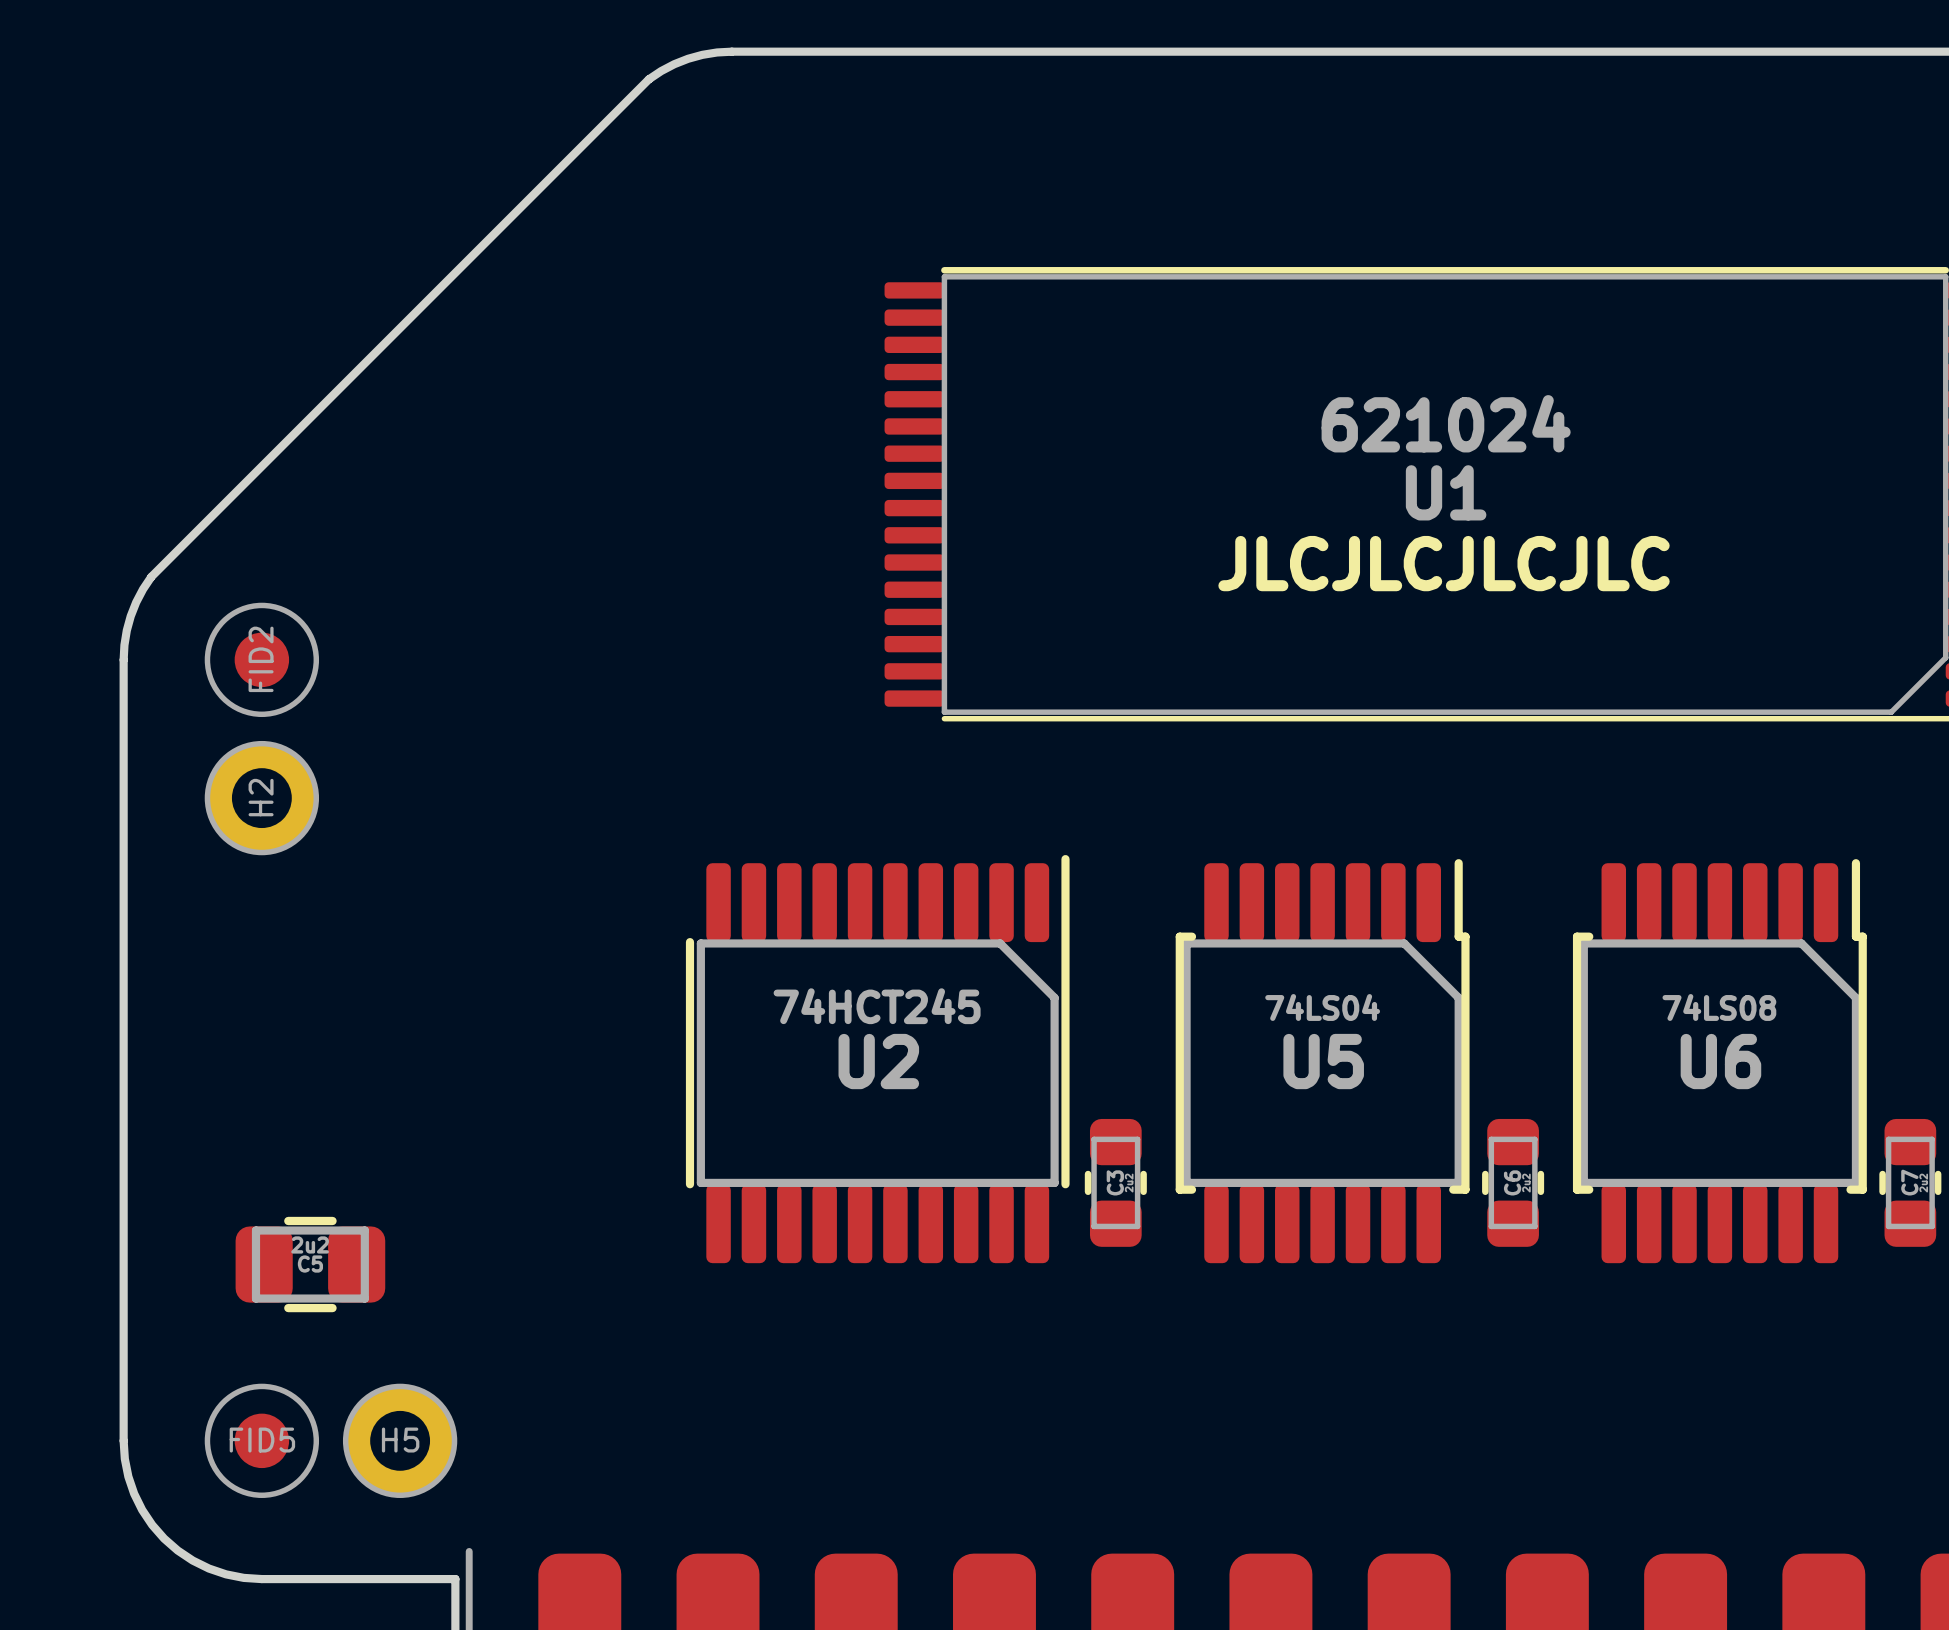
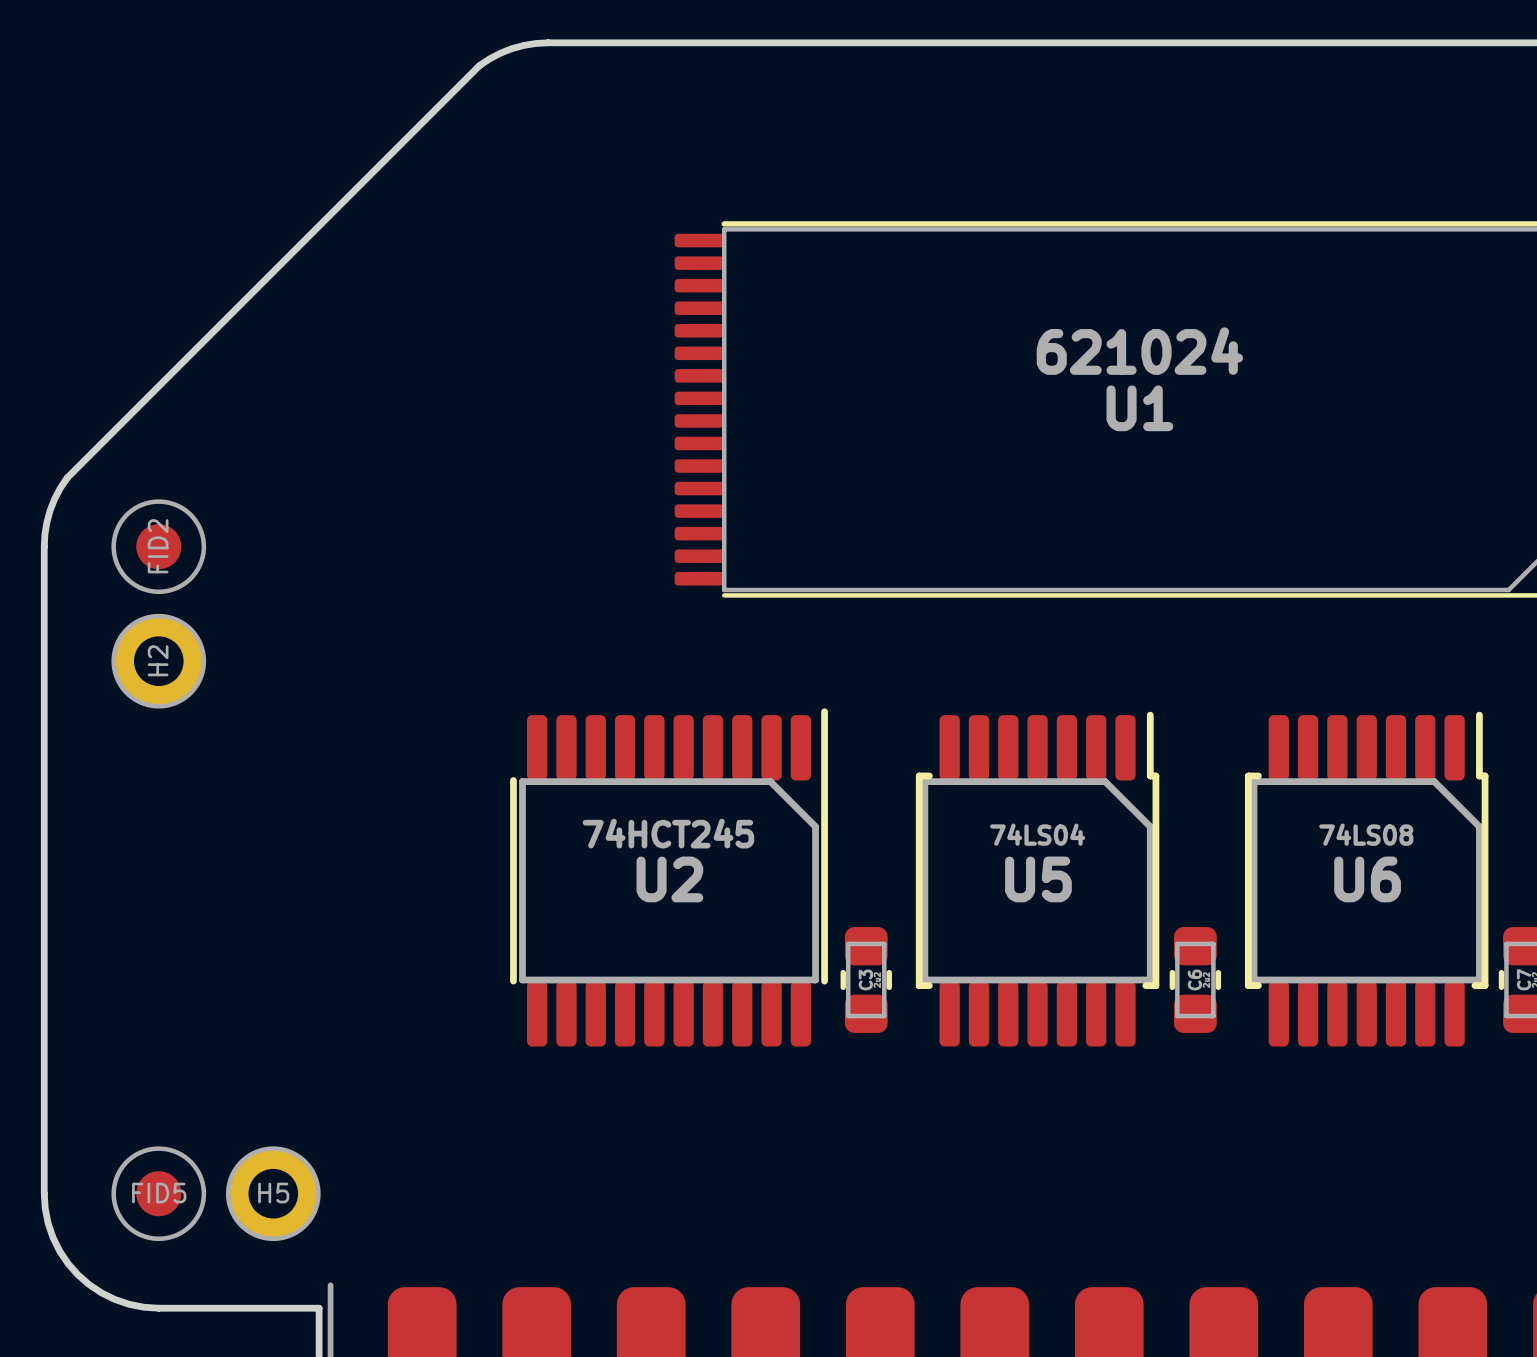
text: JLCJLCJLCJLC (1444, 563) -> none
C5: 2u2 (310, 1264) -> none

